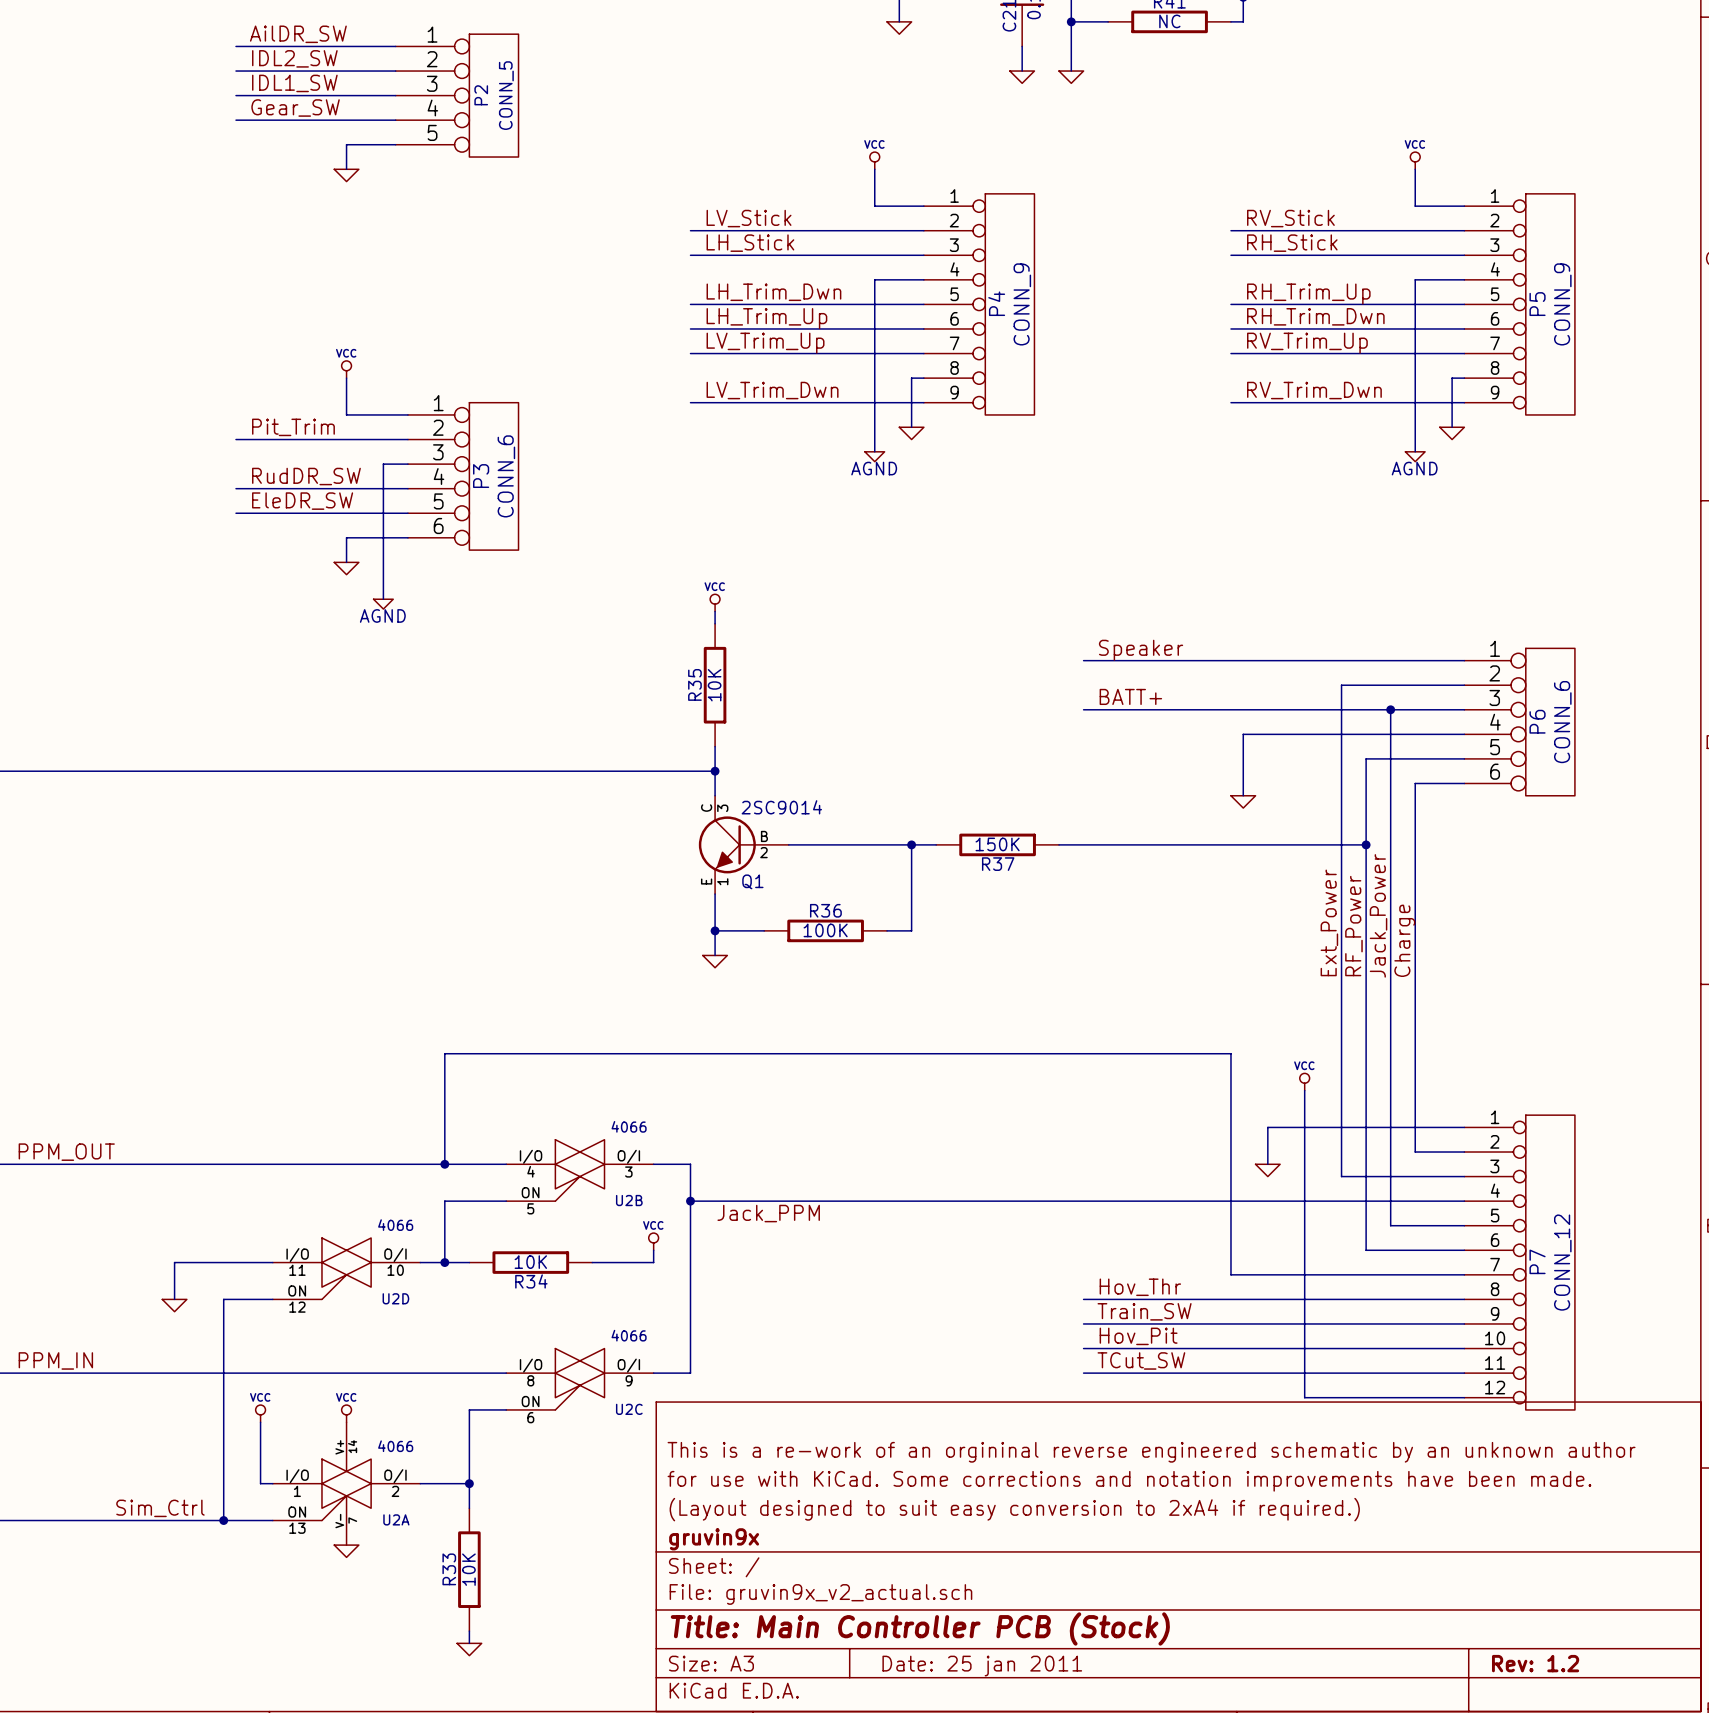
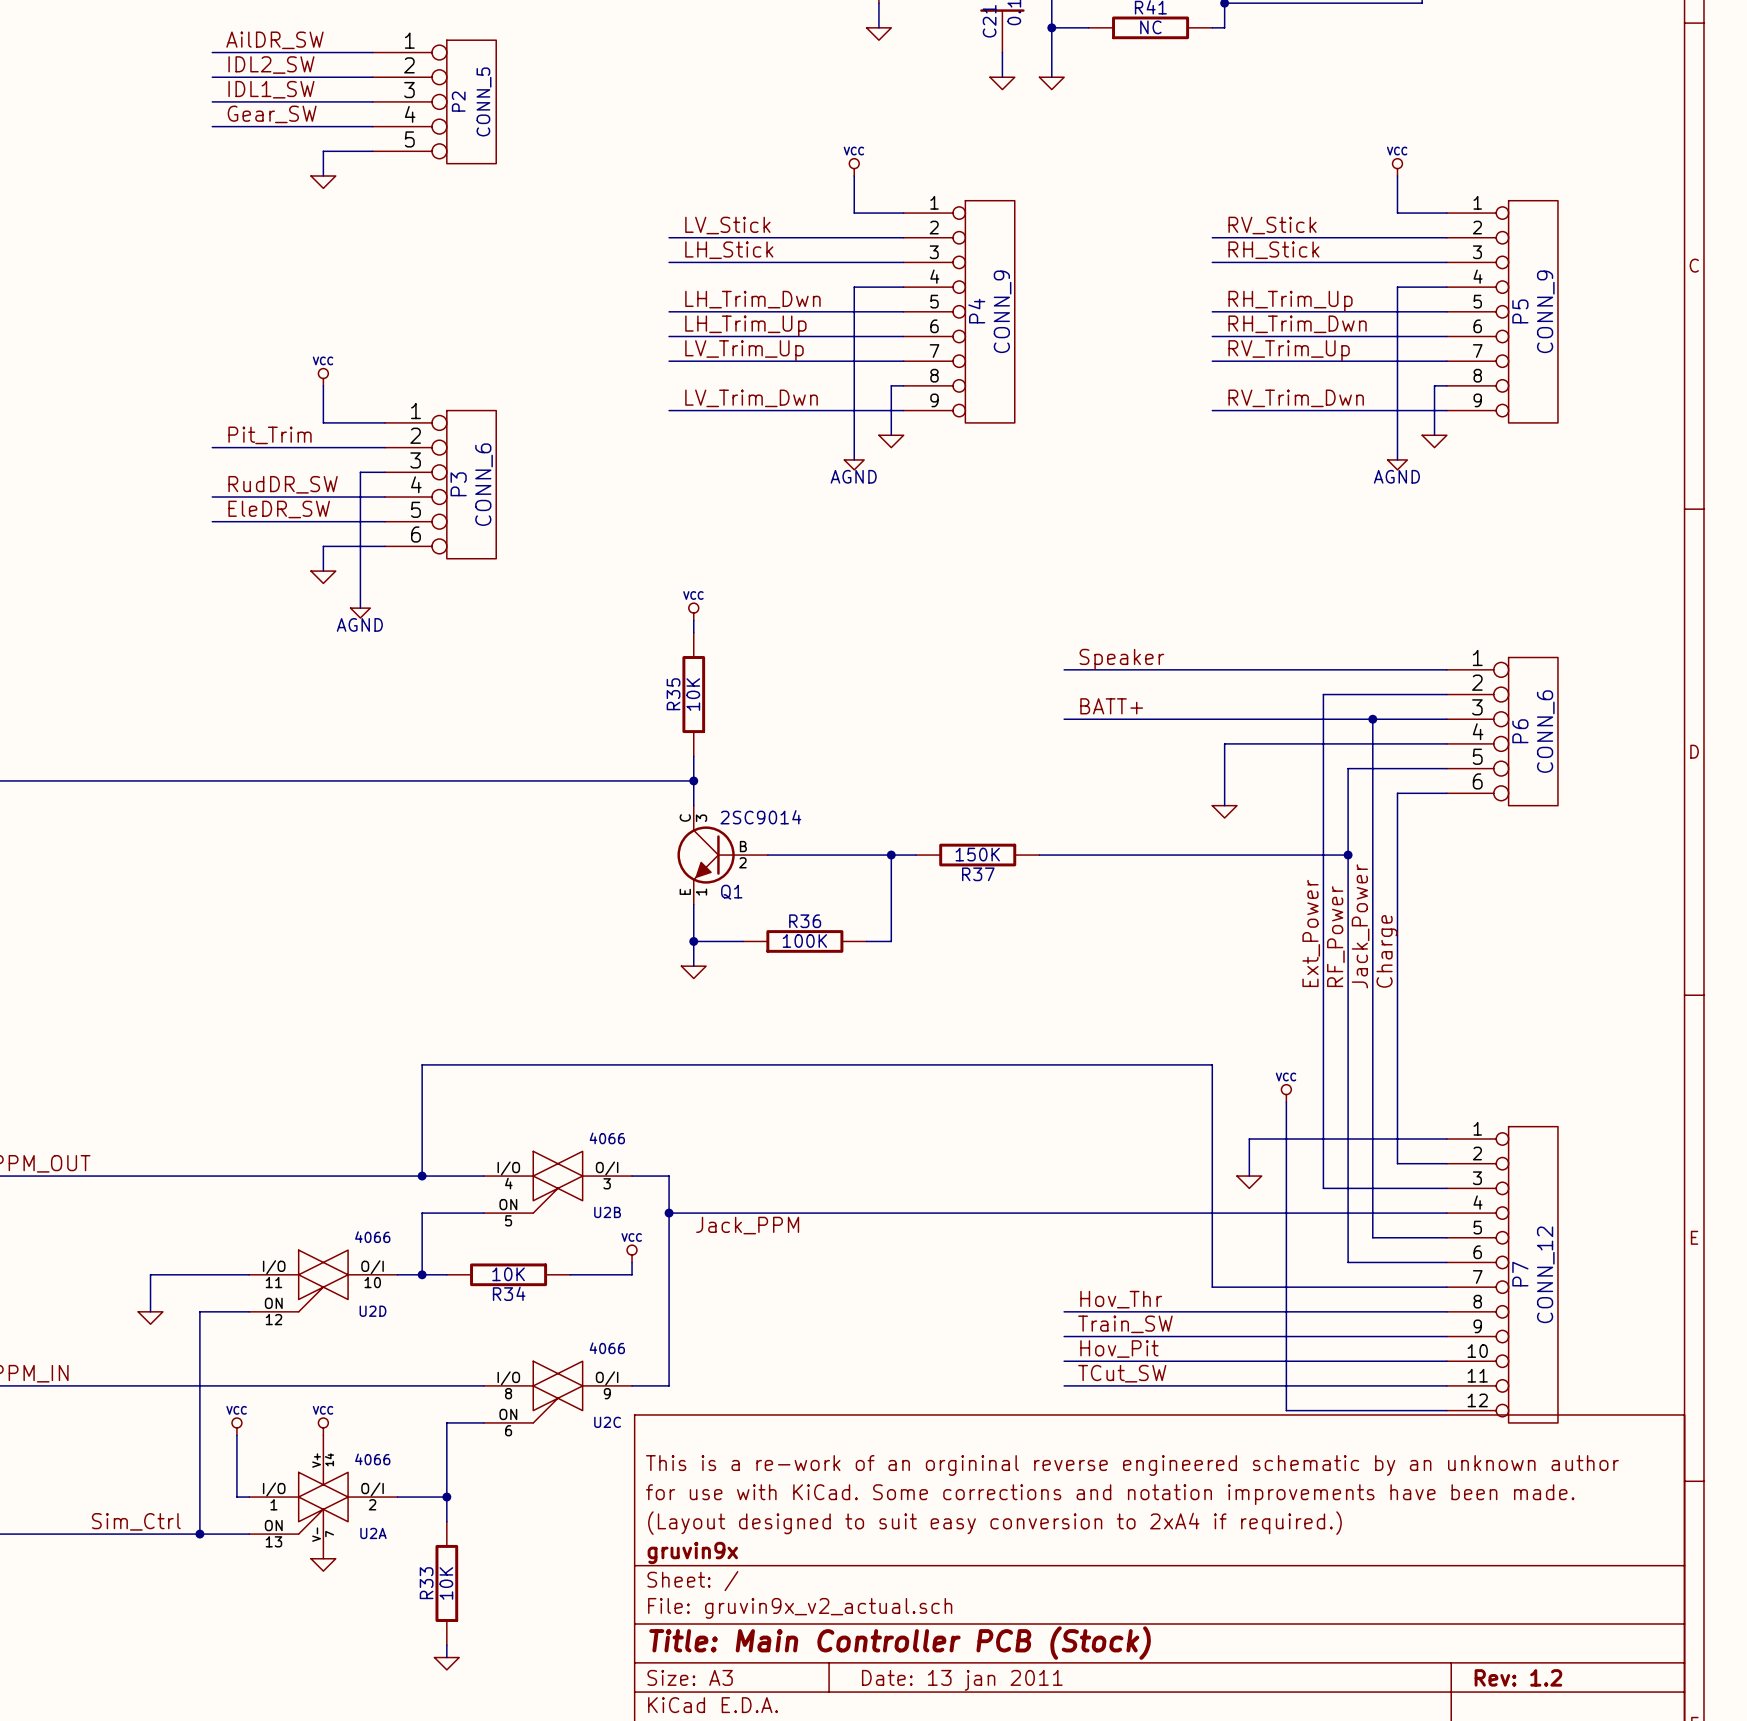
title block: Date: 25 jan 2011 (982, 1666) -> Date: 13 jan 2011 (962, 1680)

